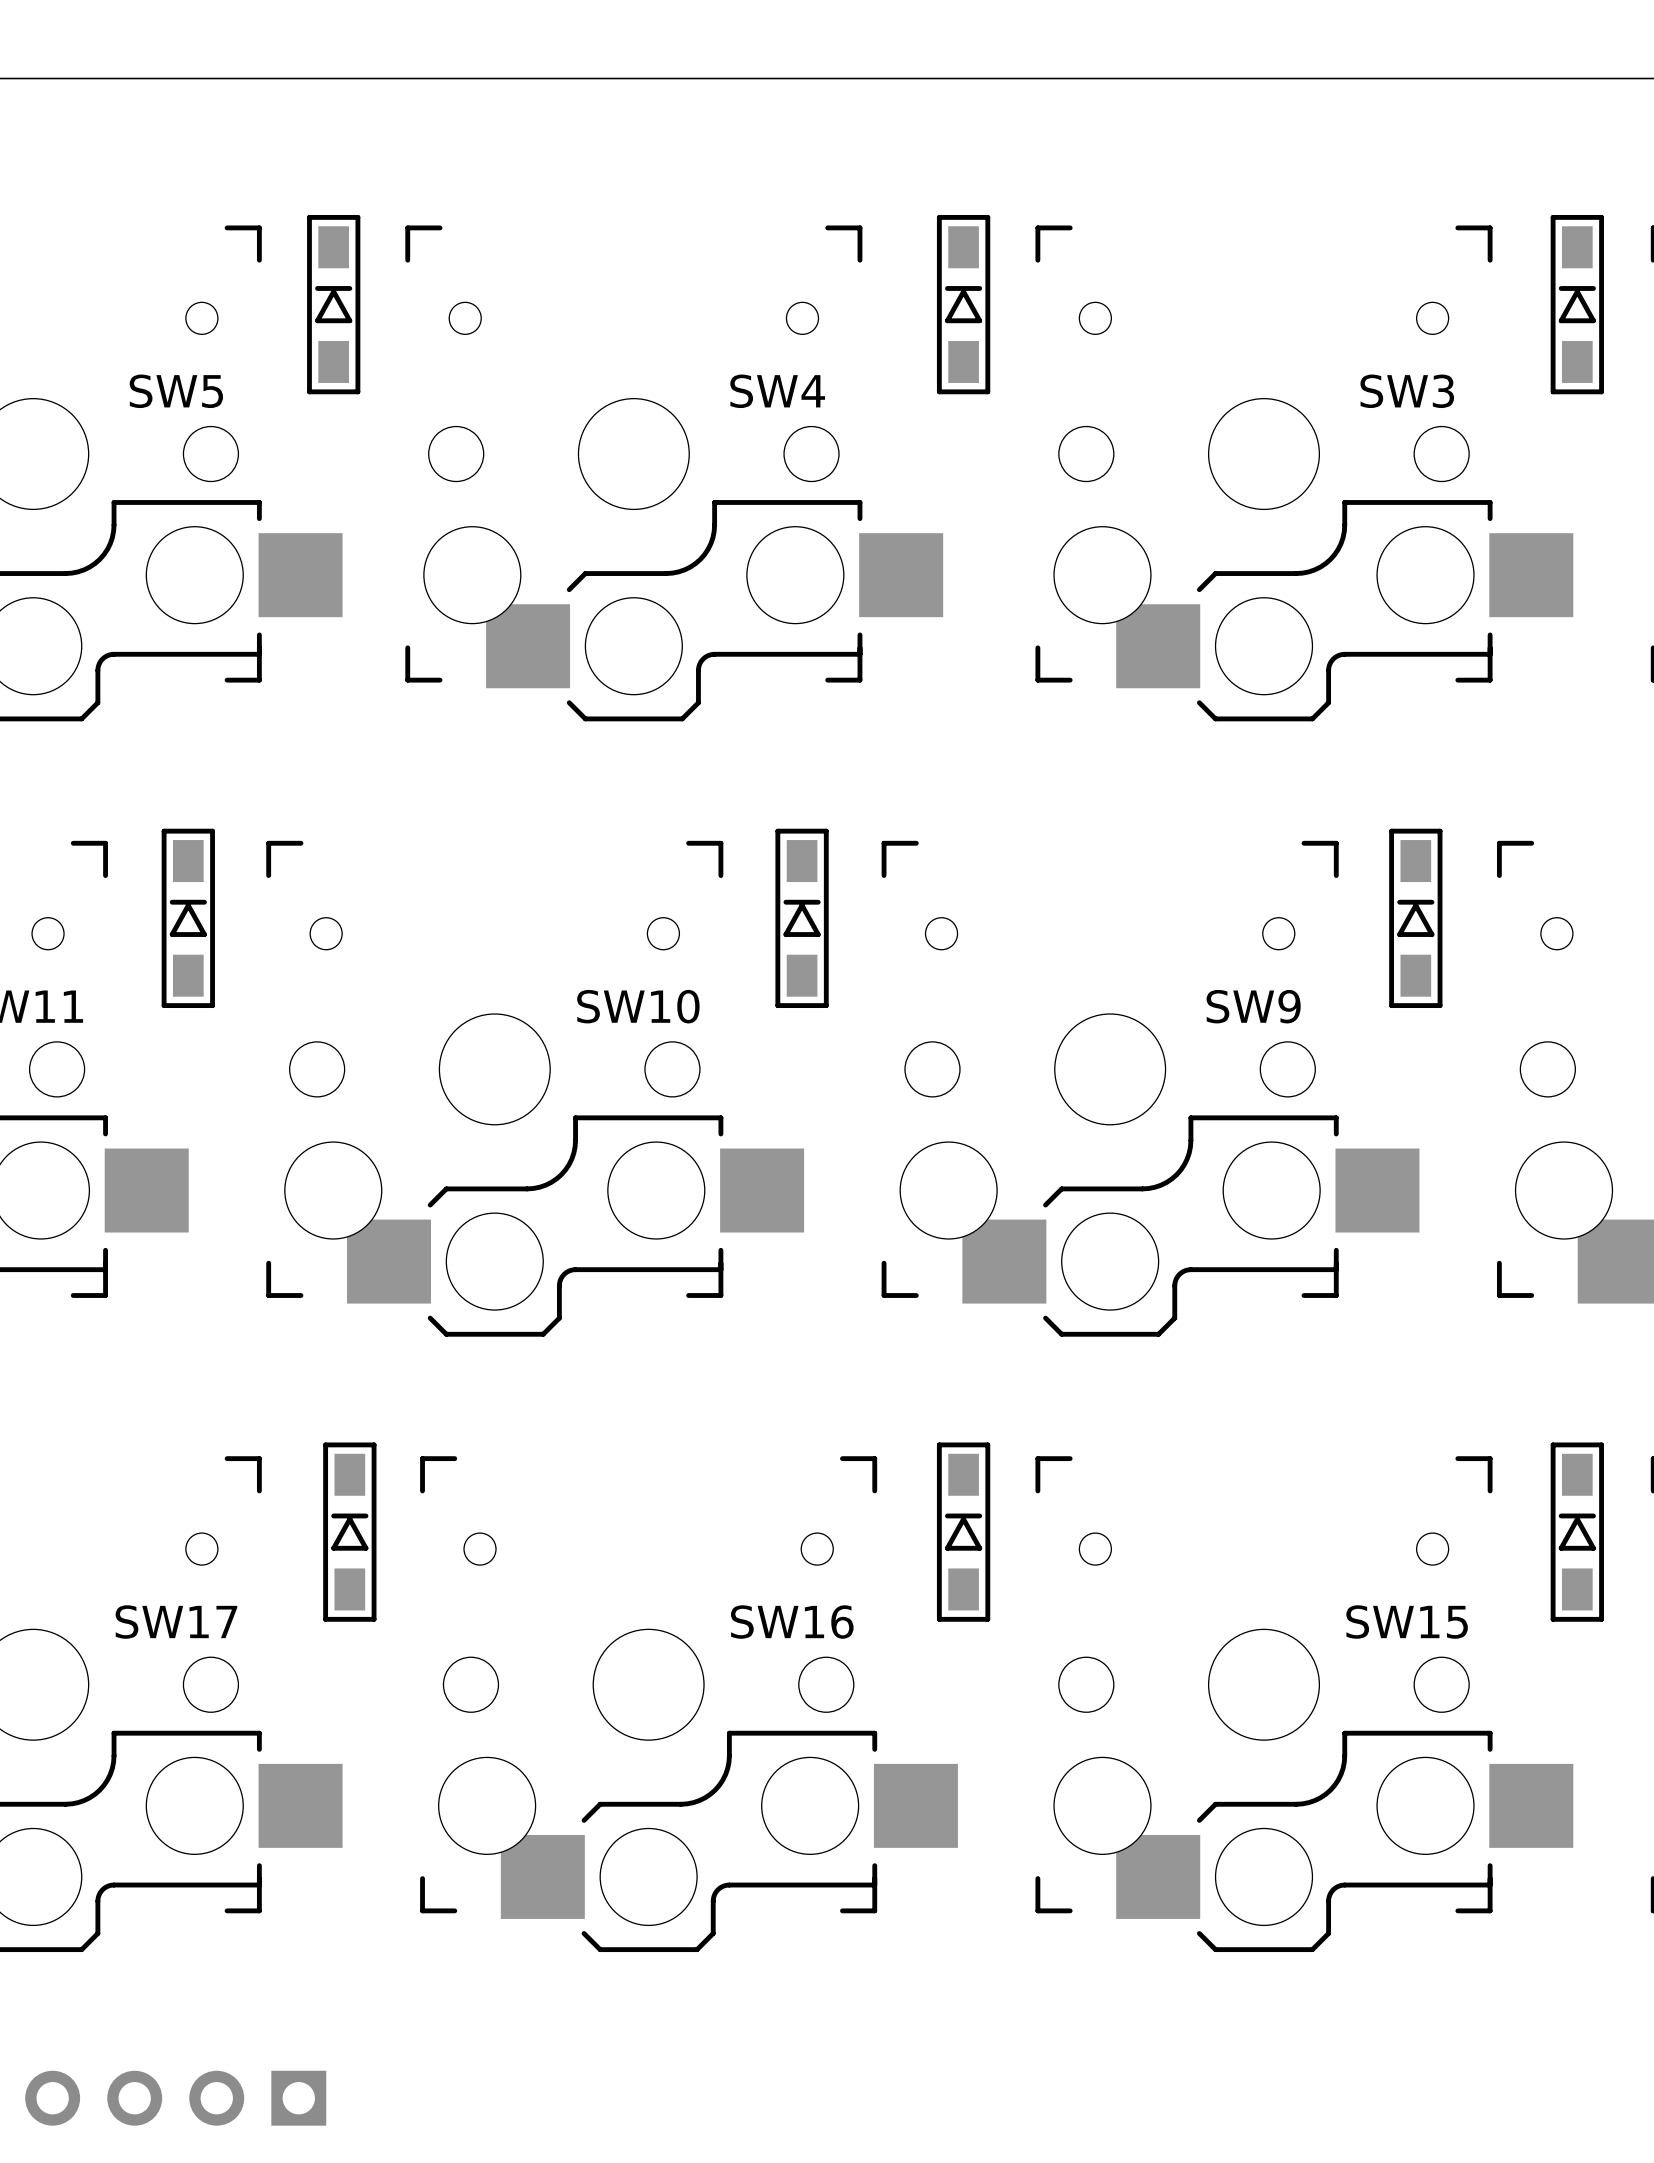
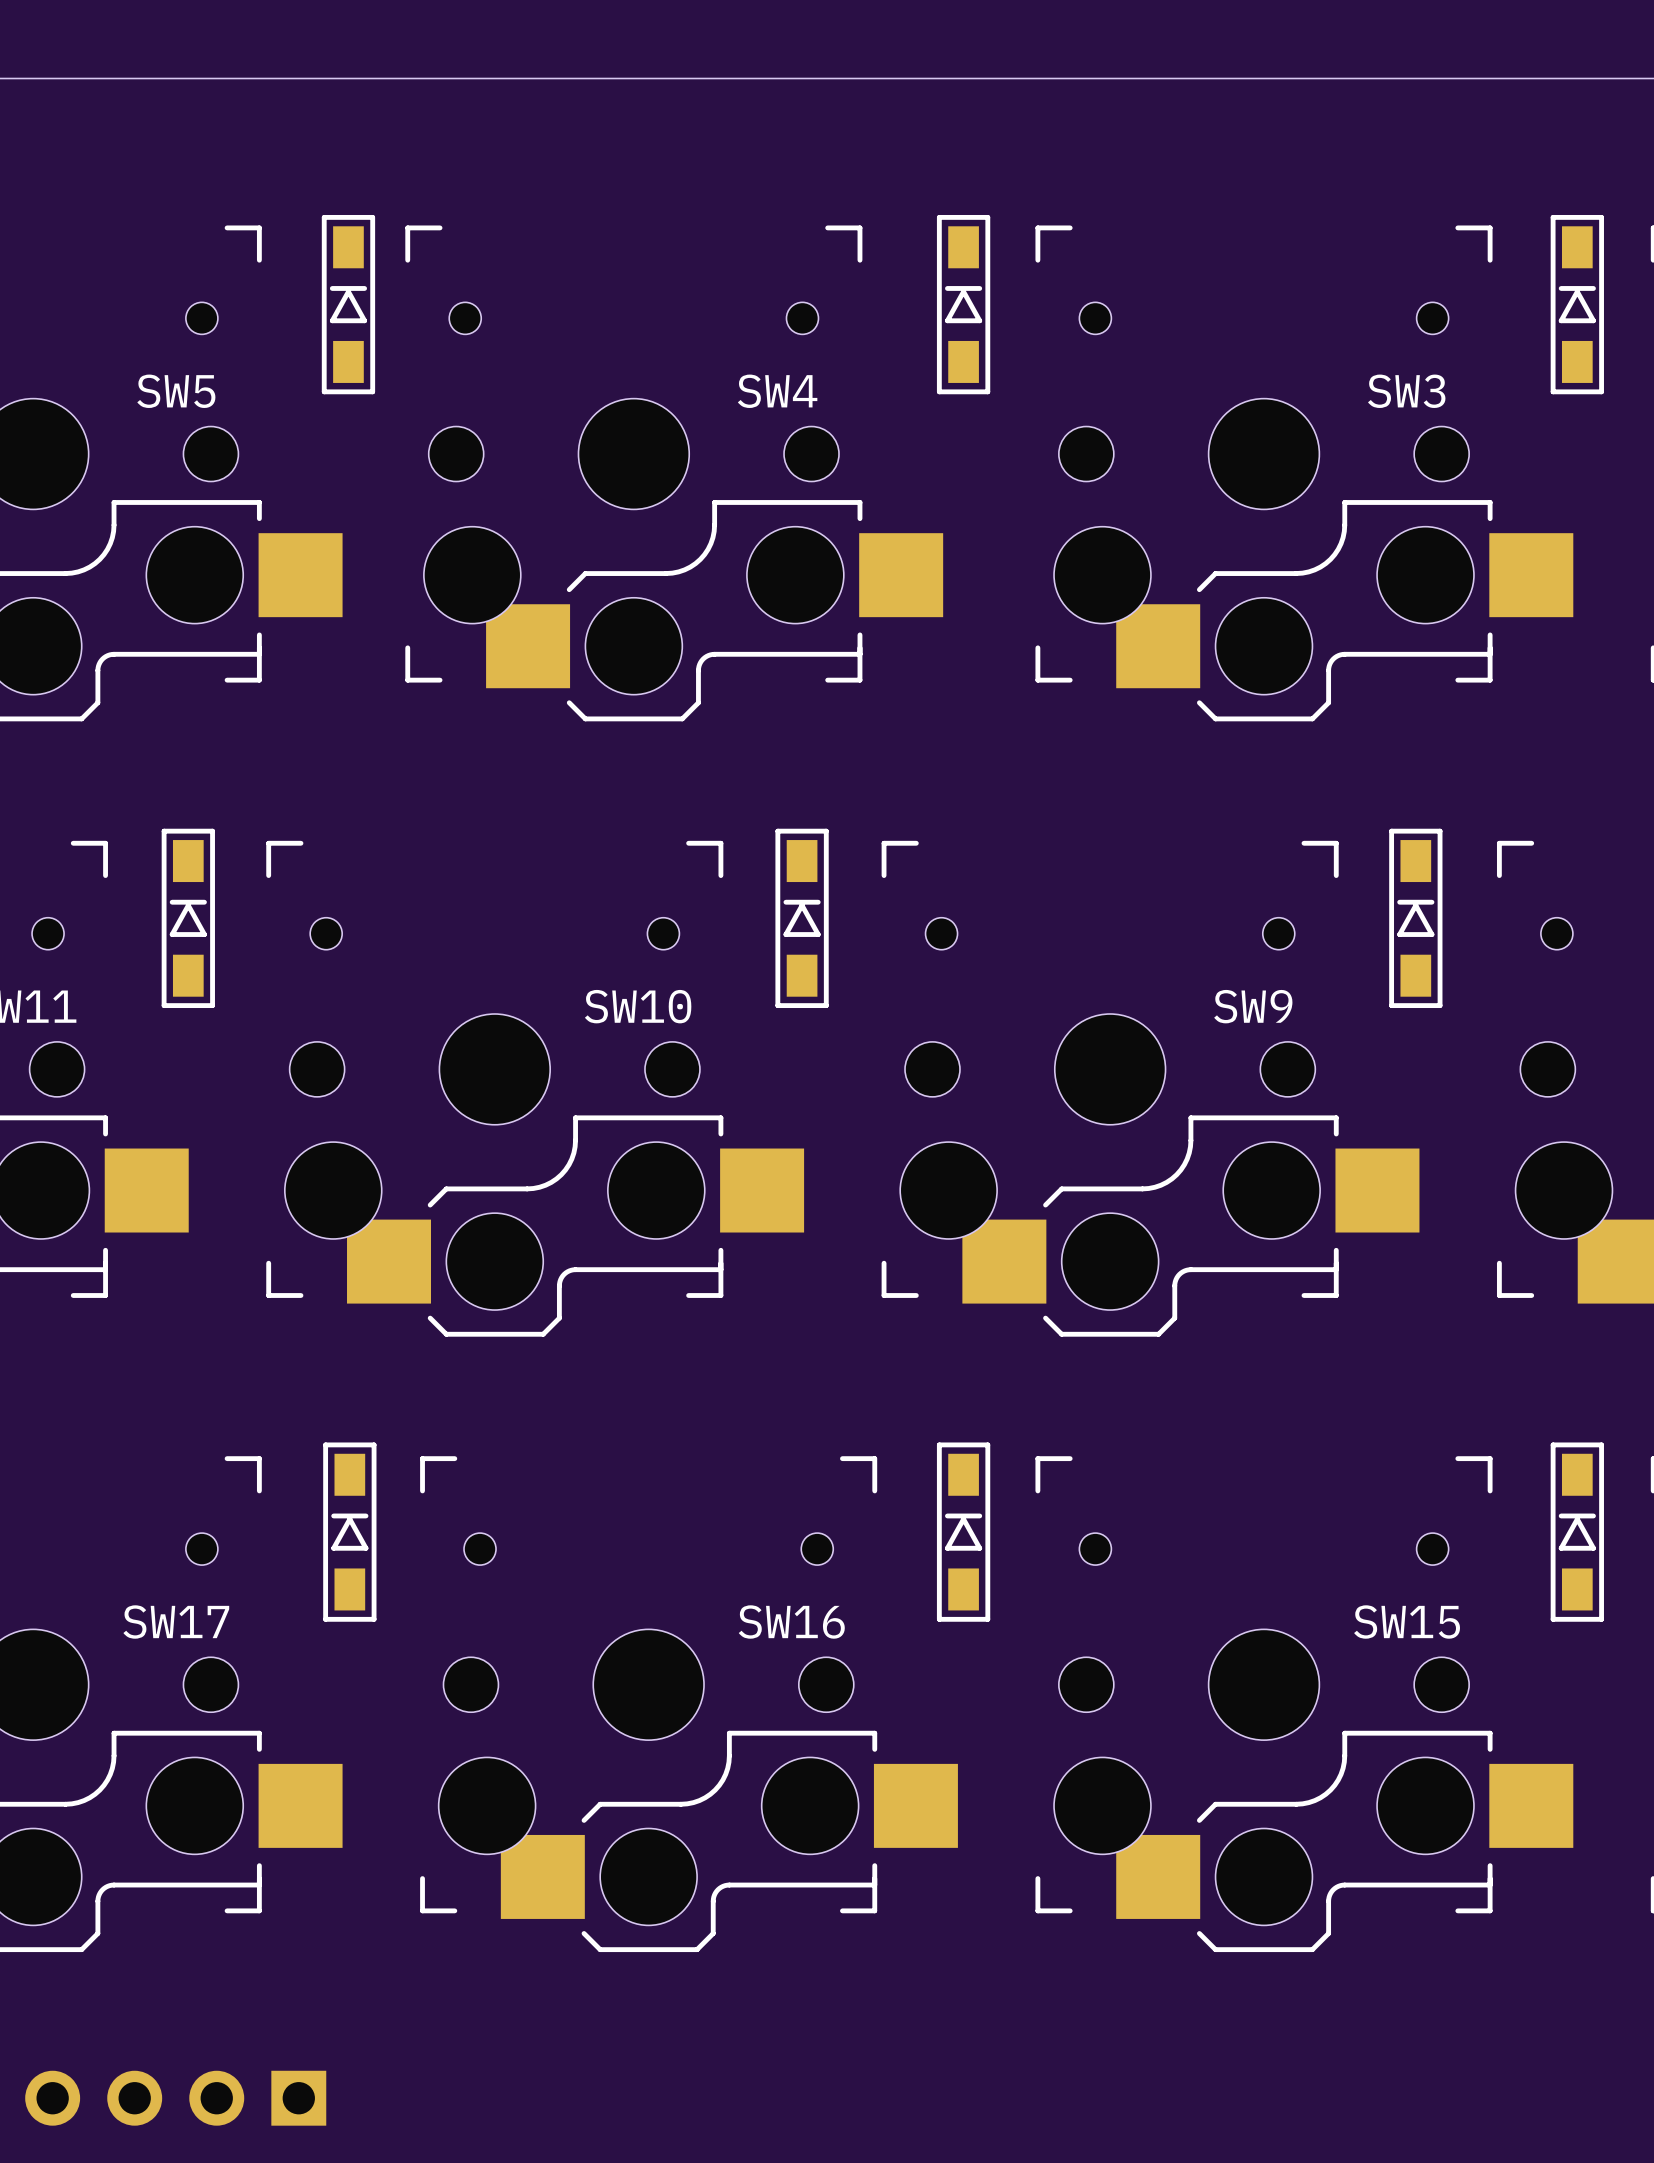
part position: (333, 304) -> (348, 304)

